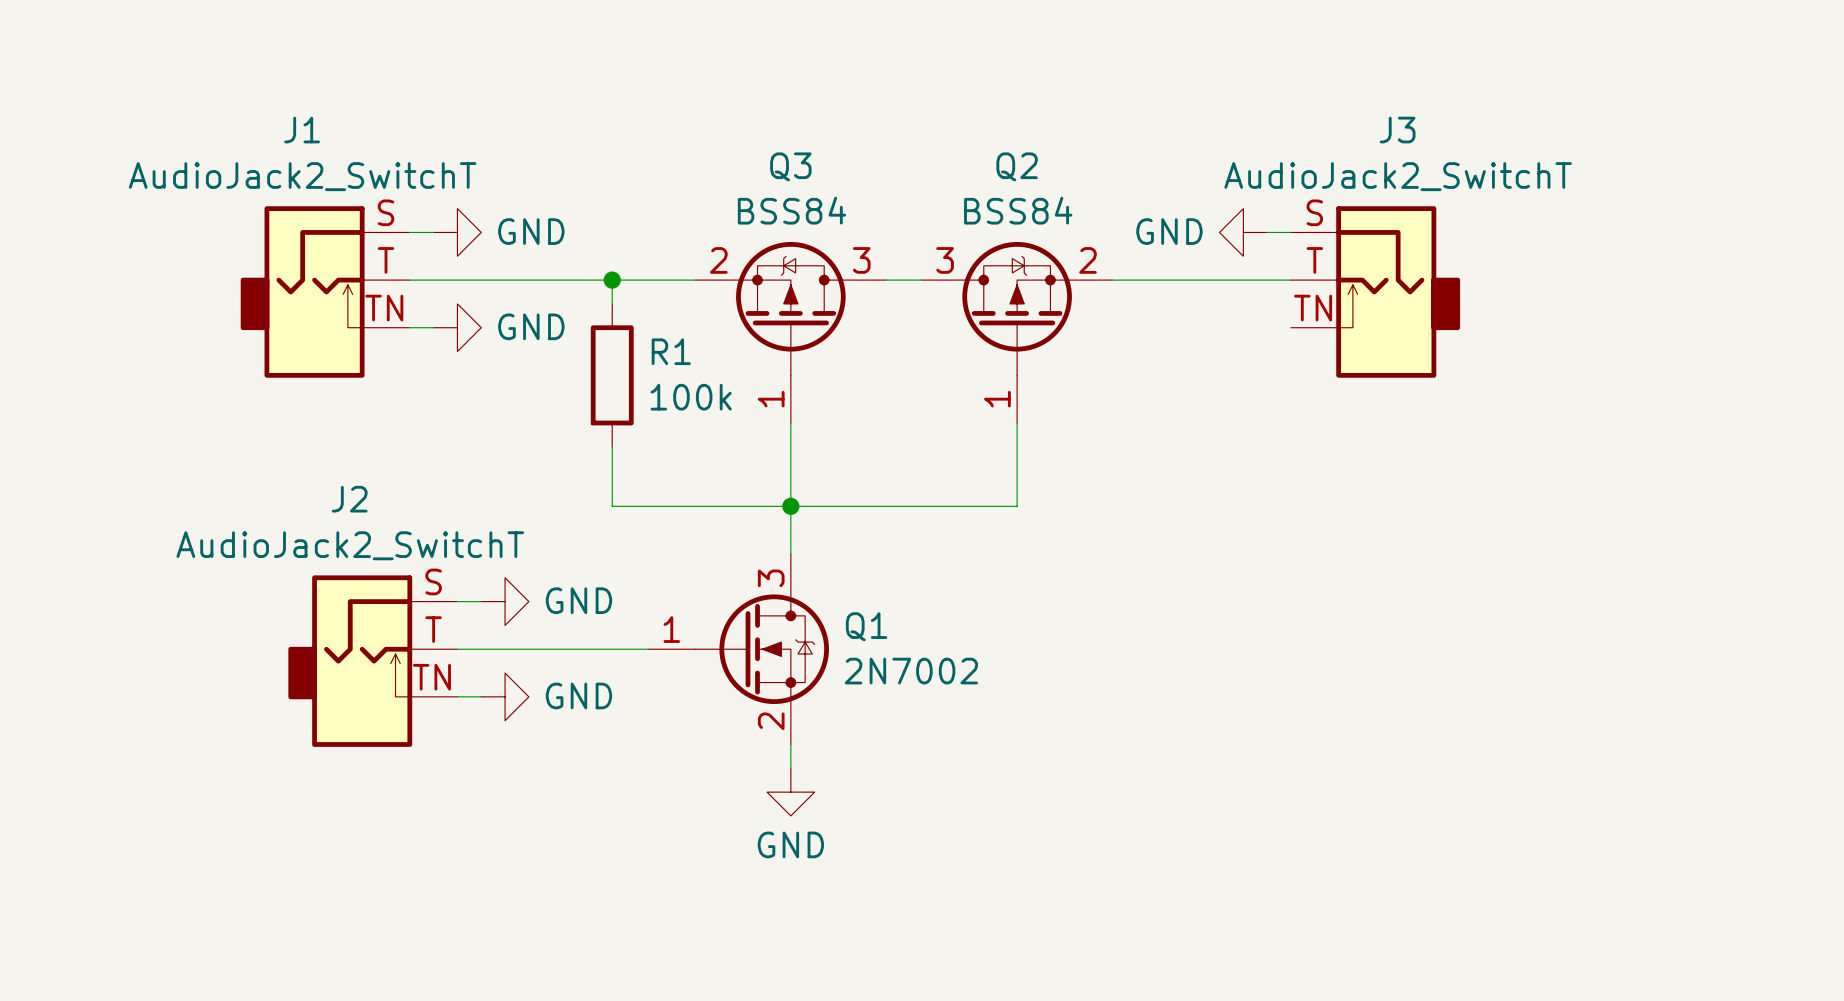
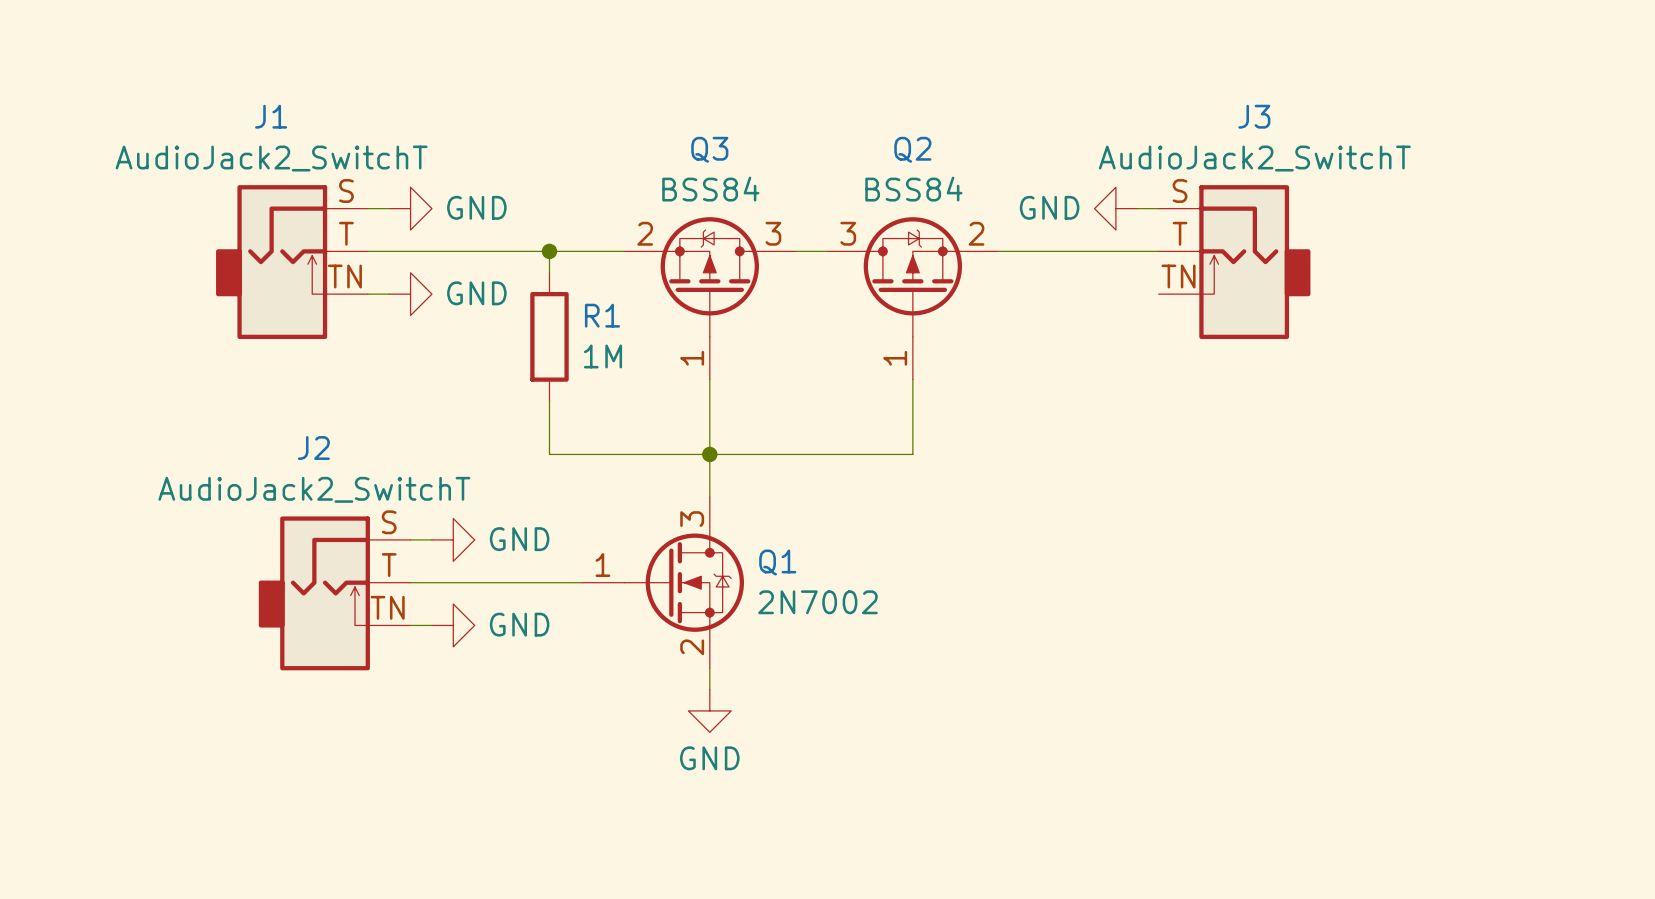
R1 value: 100k (691, 397) -> 1M (602, 356)

